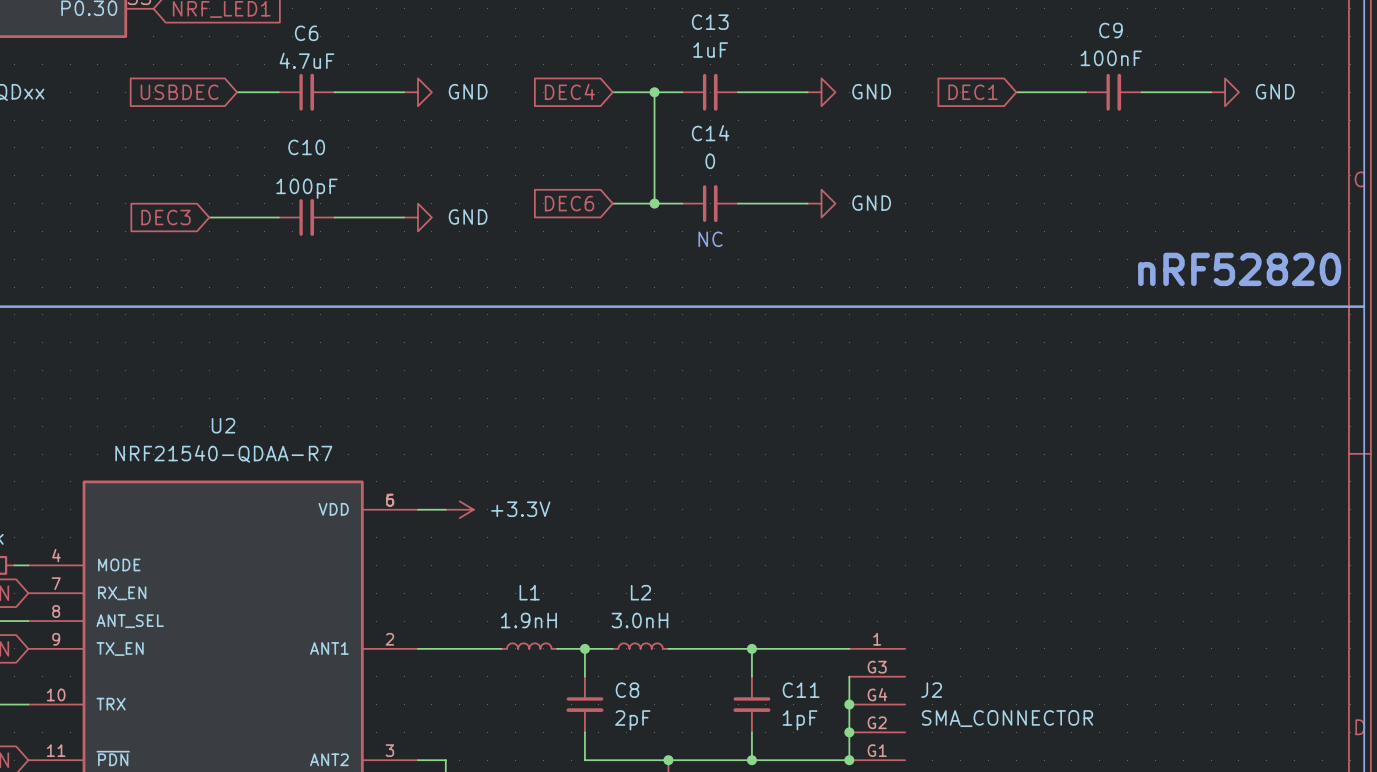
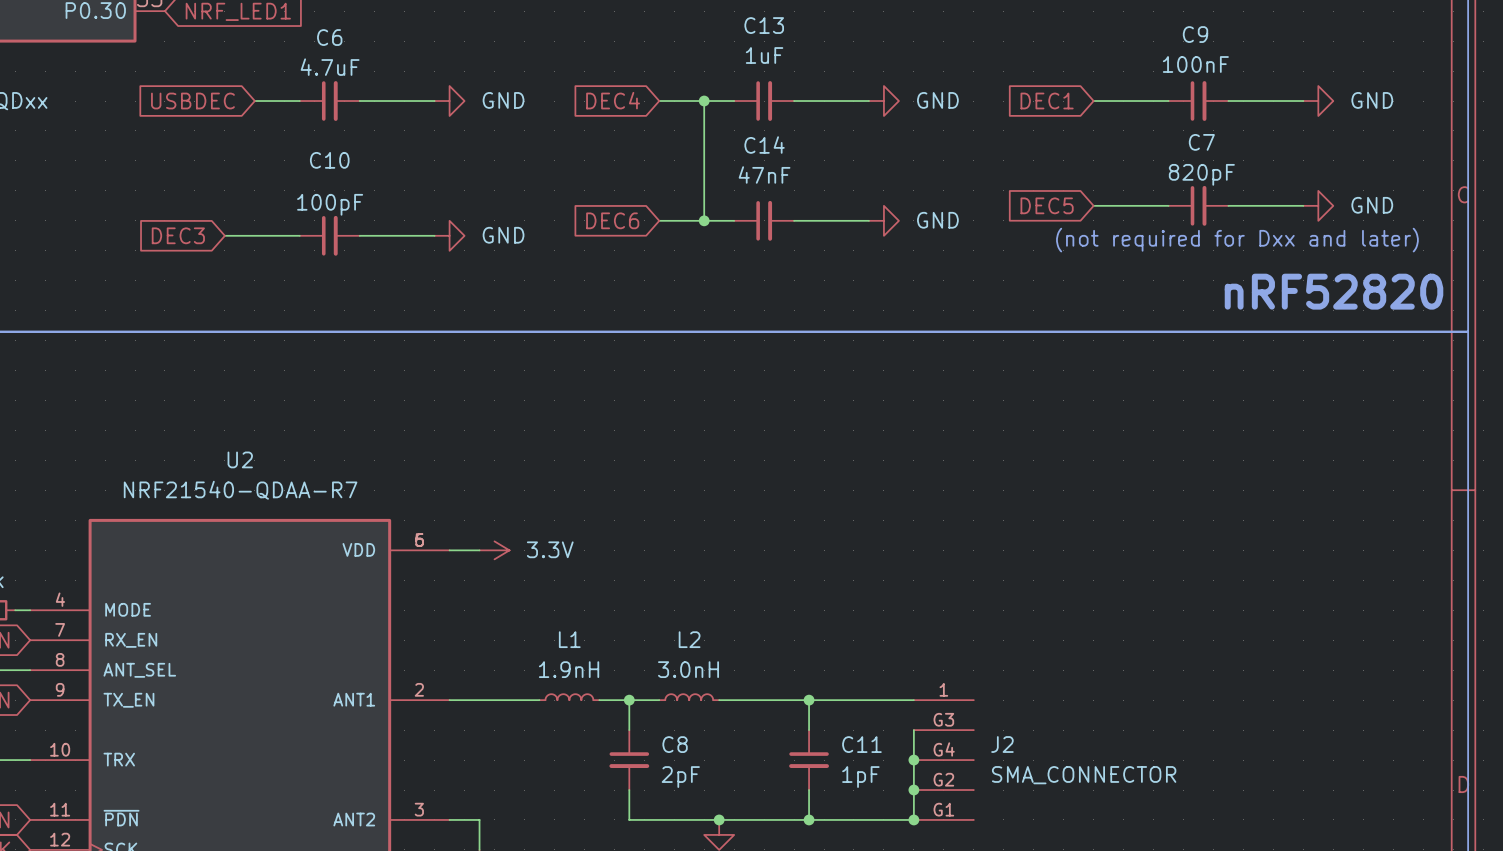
C14 value: 0 (710, 161) -> 47nF (764, 174)
global label: none -> DEC5 (1047, 205)
wire: none -> (1093, 205) (1168, 205)
C7: none -> 820pF (1198, 205)
wire: none -> (1228, 205) (1303, 205)
power symbol: none -> GND (1318, 205)
text: none -> (not required for Dxx and later) (1237, 240)
text: NC (710, 239) -> none
power symbol: +3.3V (459, 509) -> 3.3V (494, 550)

